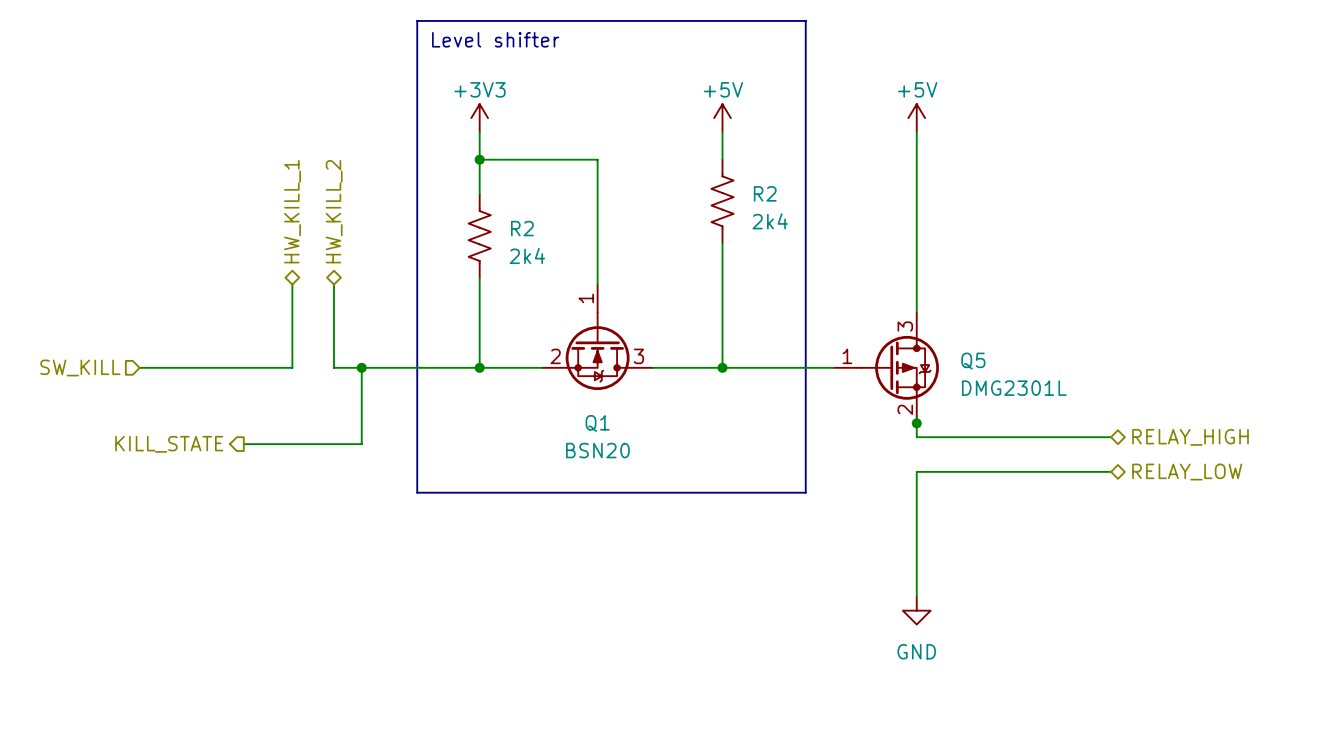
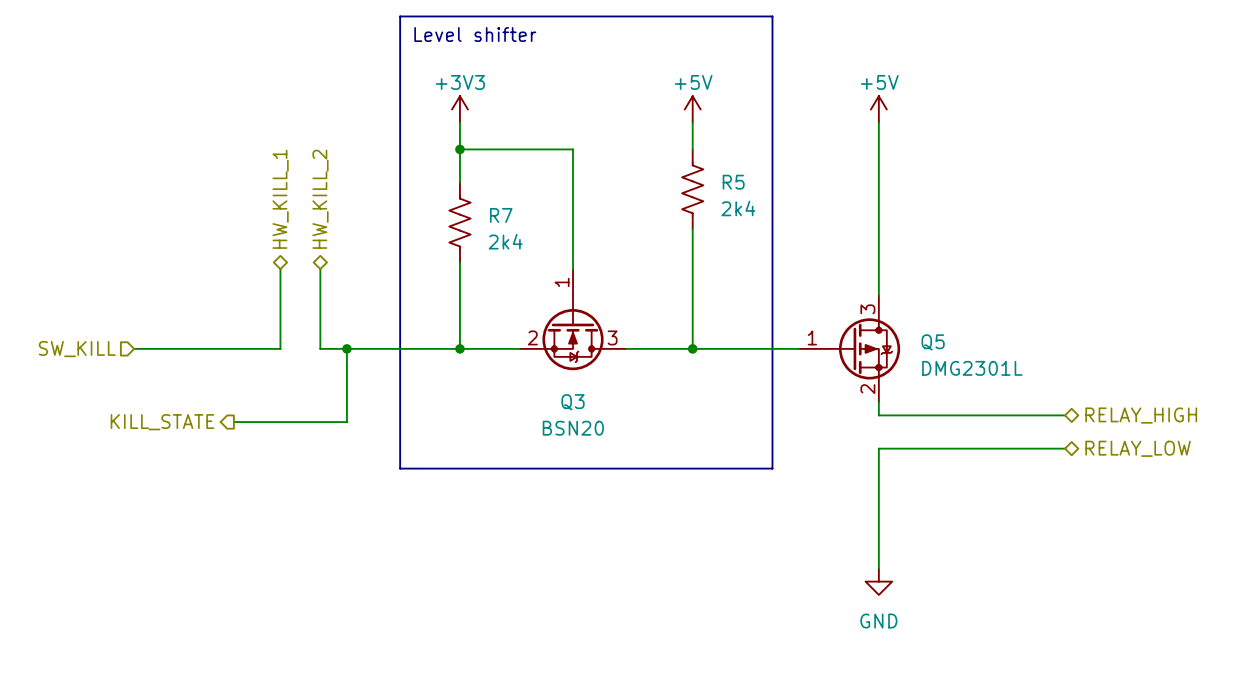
R2 name: R2 (765, 193) -> R5 (733, 182)
R2 name: R2 (522, 228) -> R7 (501, 215)
Q1 name: Q1 (597, 423) -> Q3 (573, 402)
junction: (916, 423) -> none

